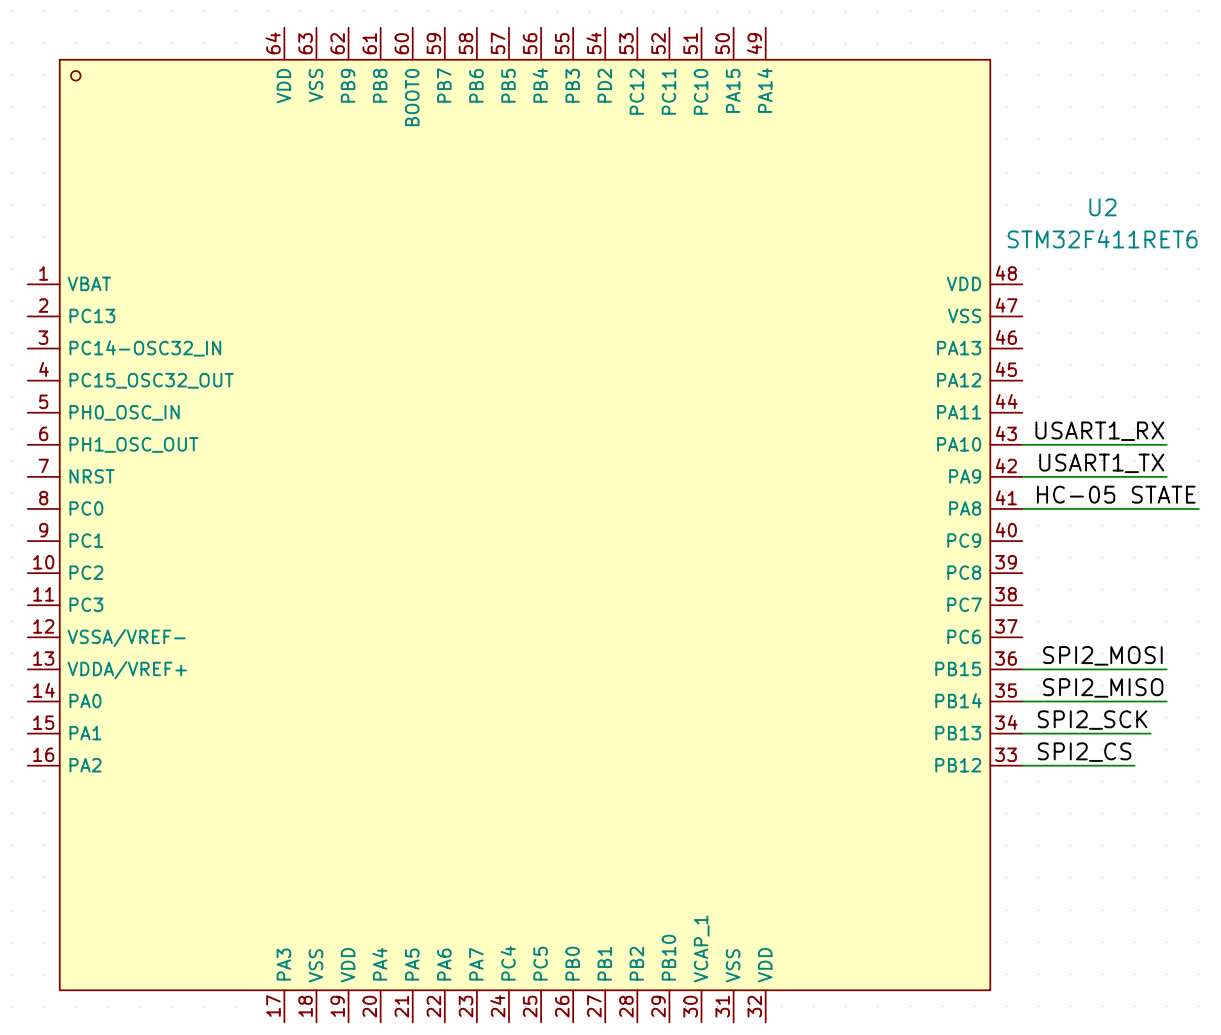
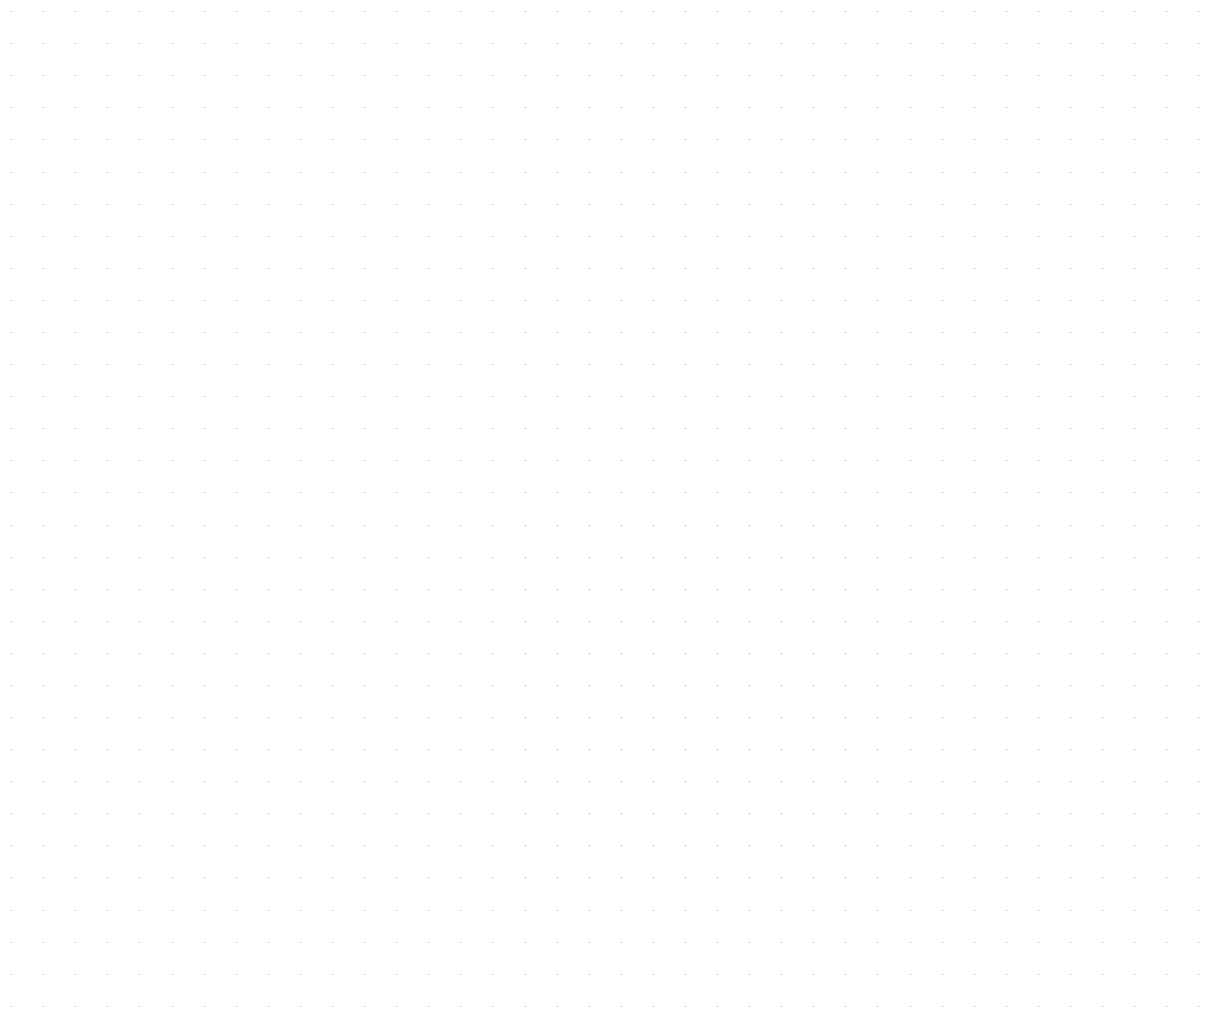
label: USART1_RX (1099, 431) -> none
wire: (1022, 444) (1166, 444) -> none
label: USART1_TX (1101, 463) -> none
wire: (1022, 476) (1166, 476) -> none
label: HC-05 STATE (1116, 494) -> none
wire: (1022, 508) (1198, 508) -> none
U2: STM32F411RET6 (525, 525) -> none
label: SPI2_MOSI (1102, 655) -> none
wire: (1022, 669) (1166, 669) -> none
label: SPI2_MISO (1103, 687) -> none
wire: (1022, 701) (1166, 701) -> none
label: SPI2_SCK (1092, 720) -> none
wire: (1022, 733) (1150, 733) -> none
label: SPI2_CS (1084, 752) -> none
wire: (1022, 765) (1134, 765) -> none

